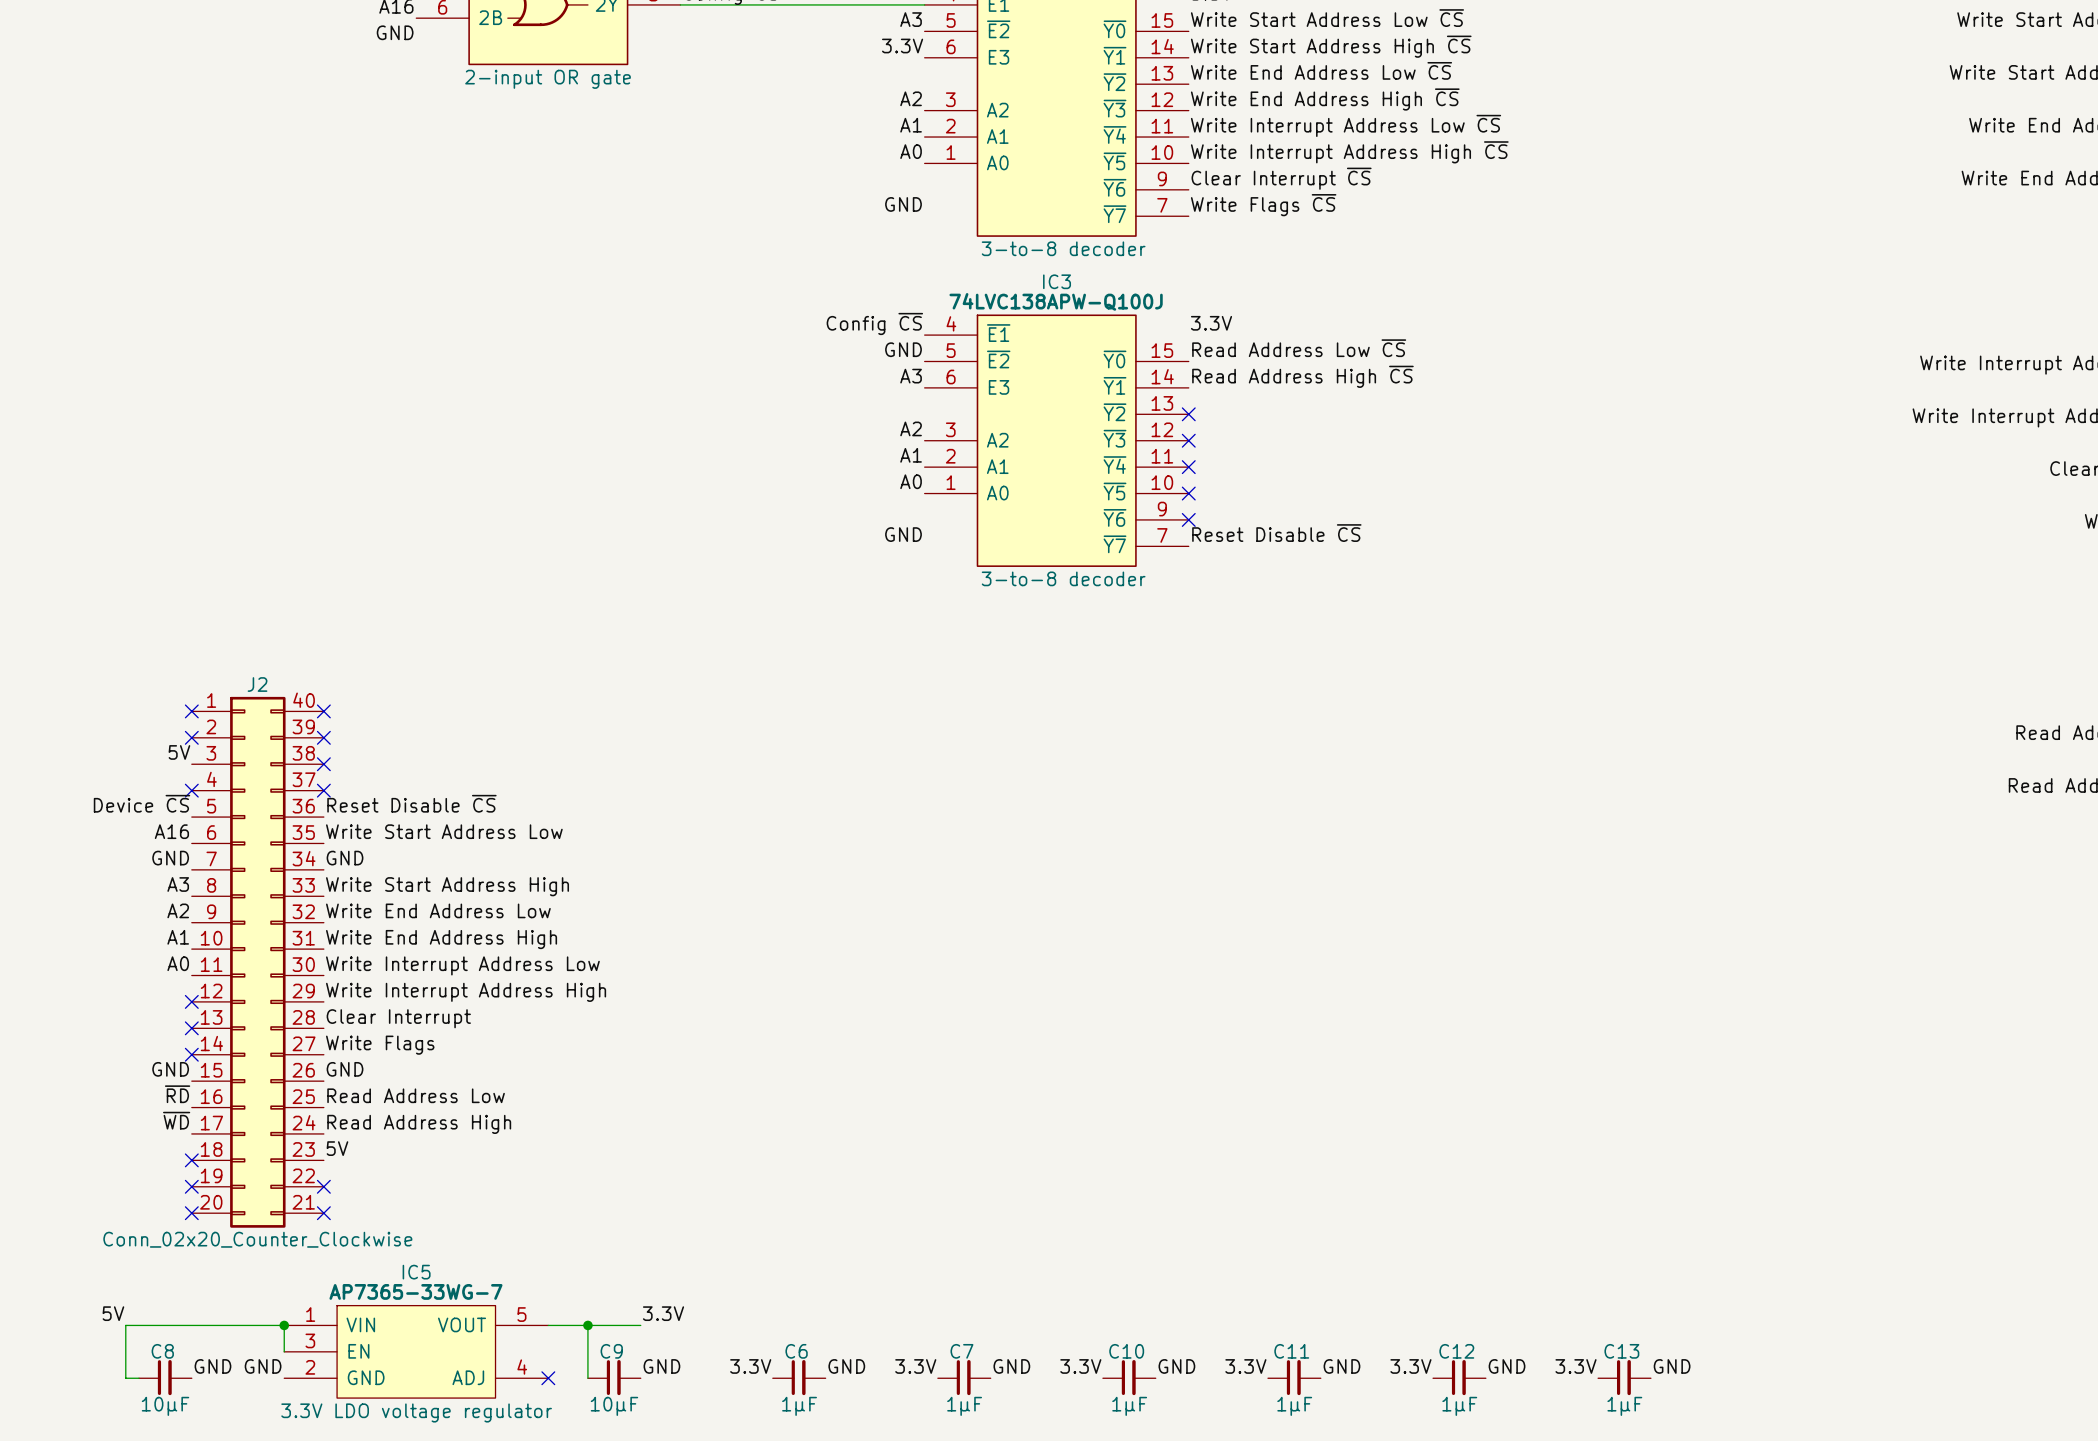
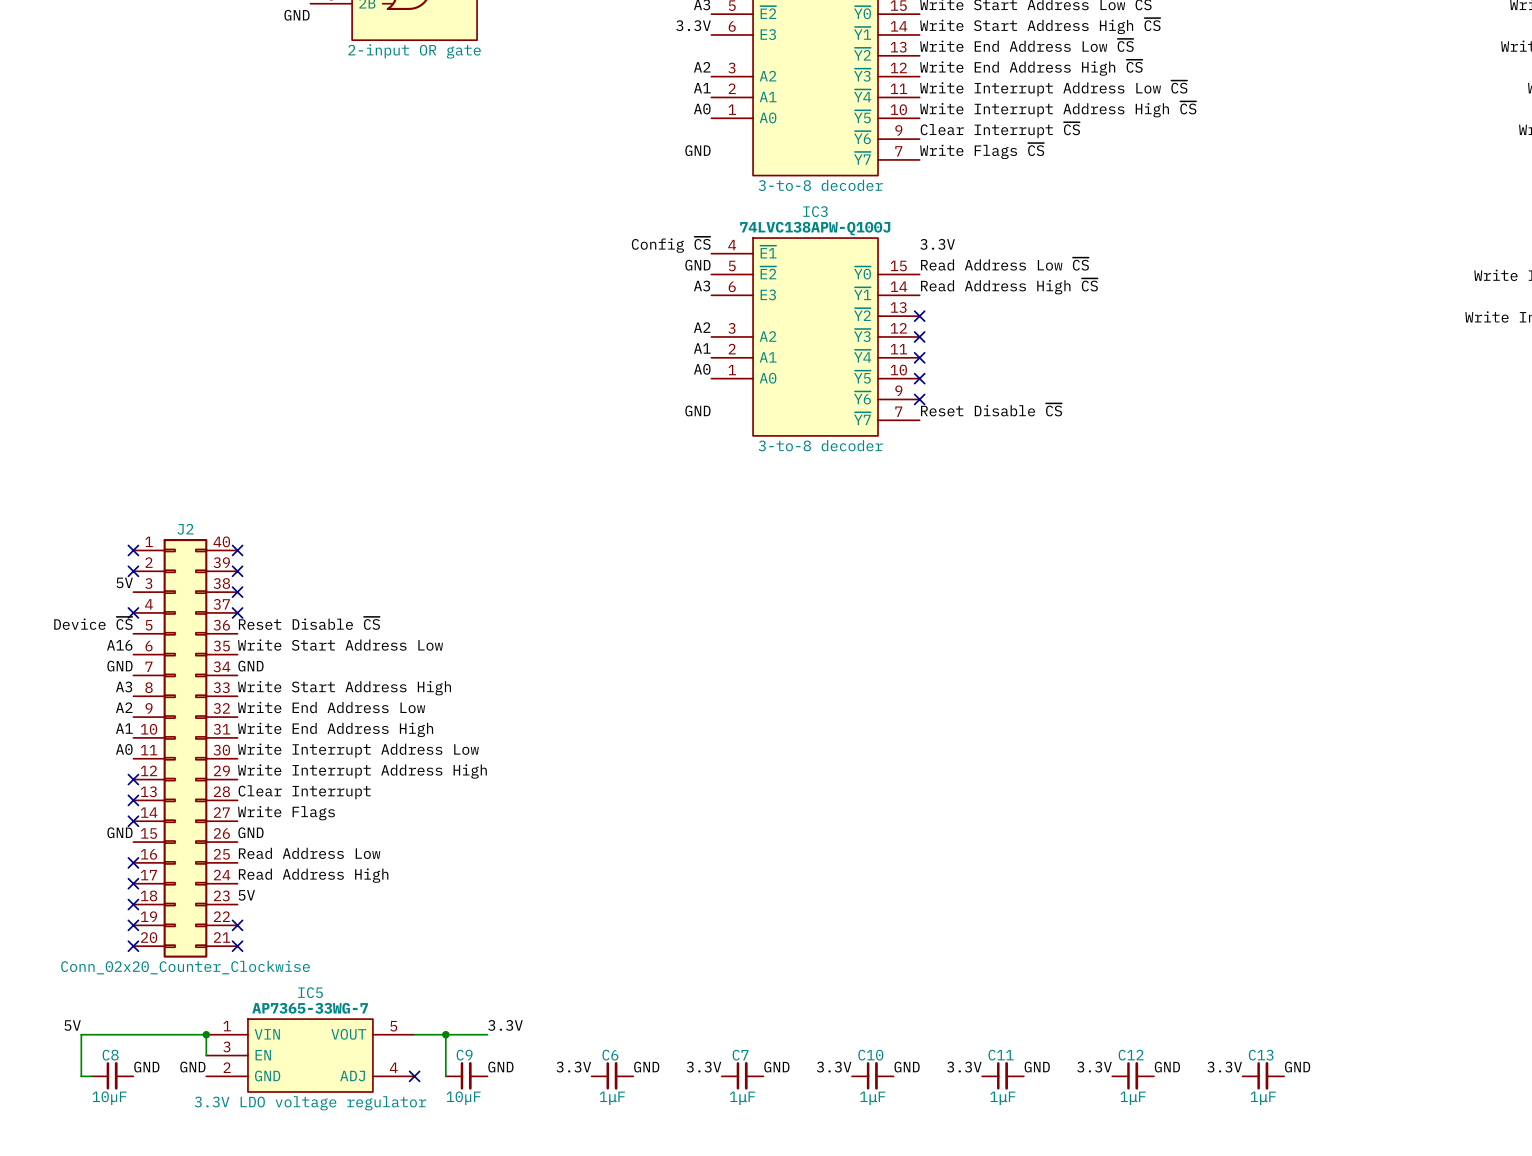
label: ~{RD} (177, 1094) -> none
no-connect mark: none -> (133, 862)
label: ~{WD} (176, 1120) -> none
no-connect mark: none -> (133, 883)

